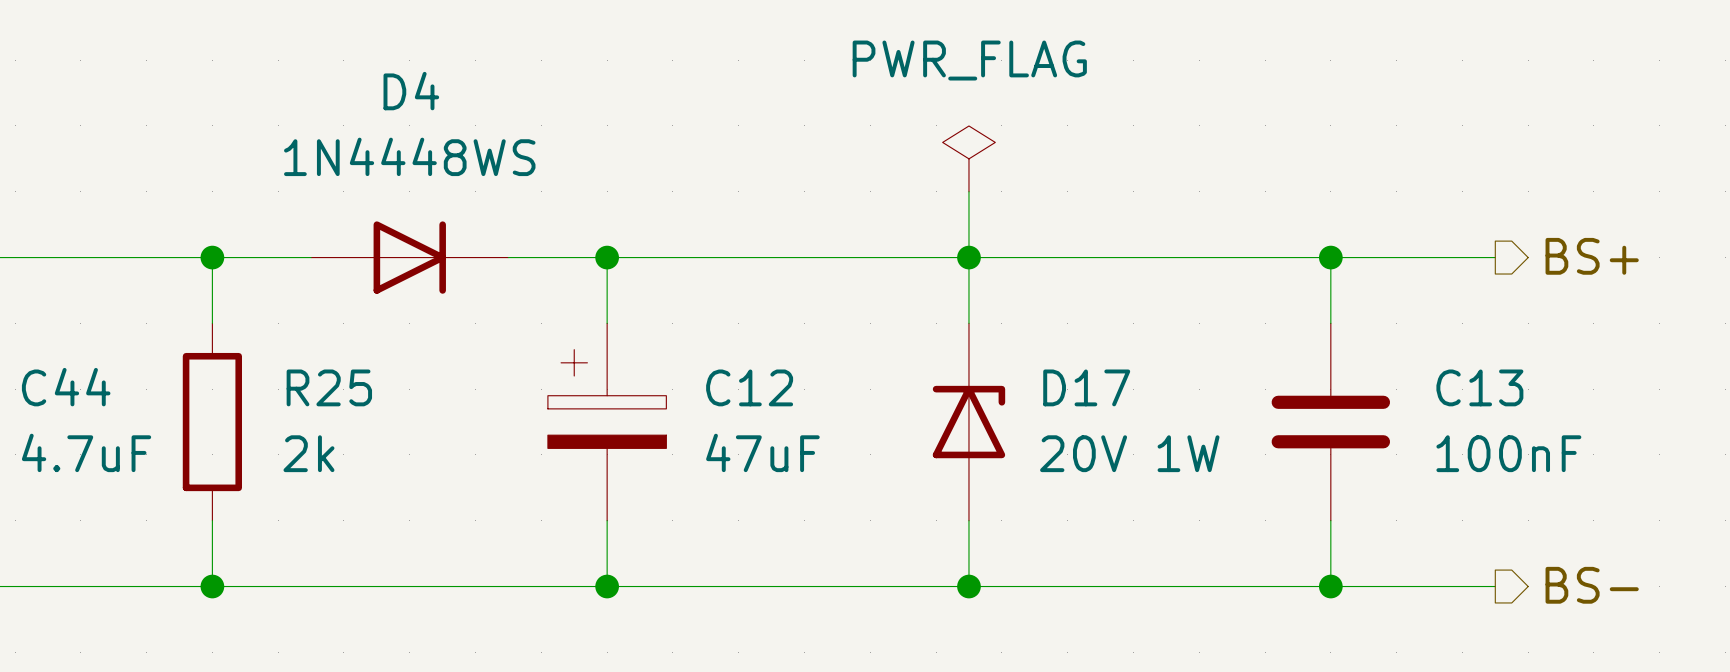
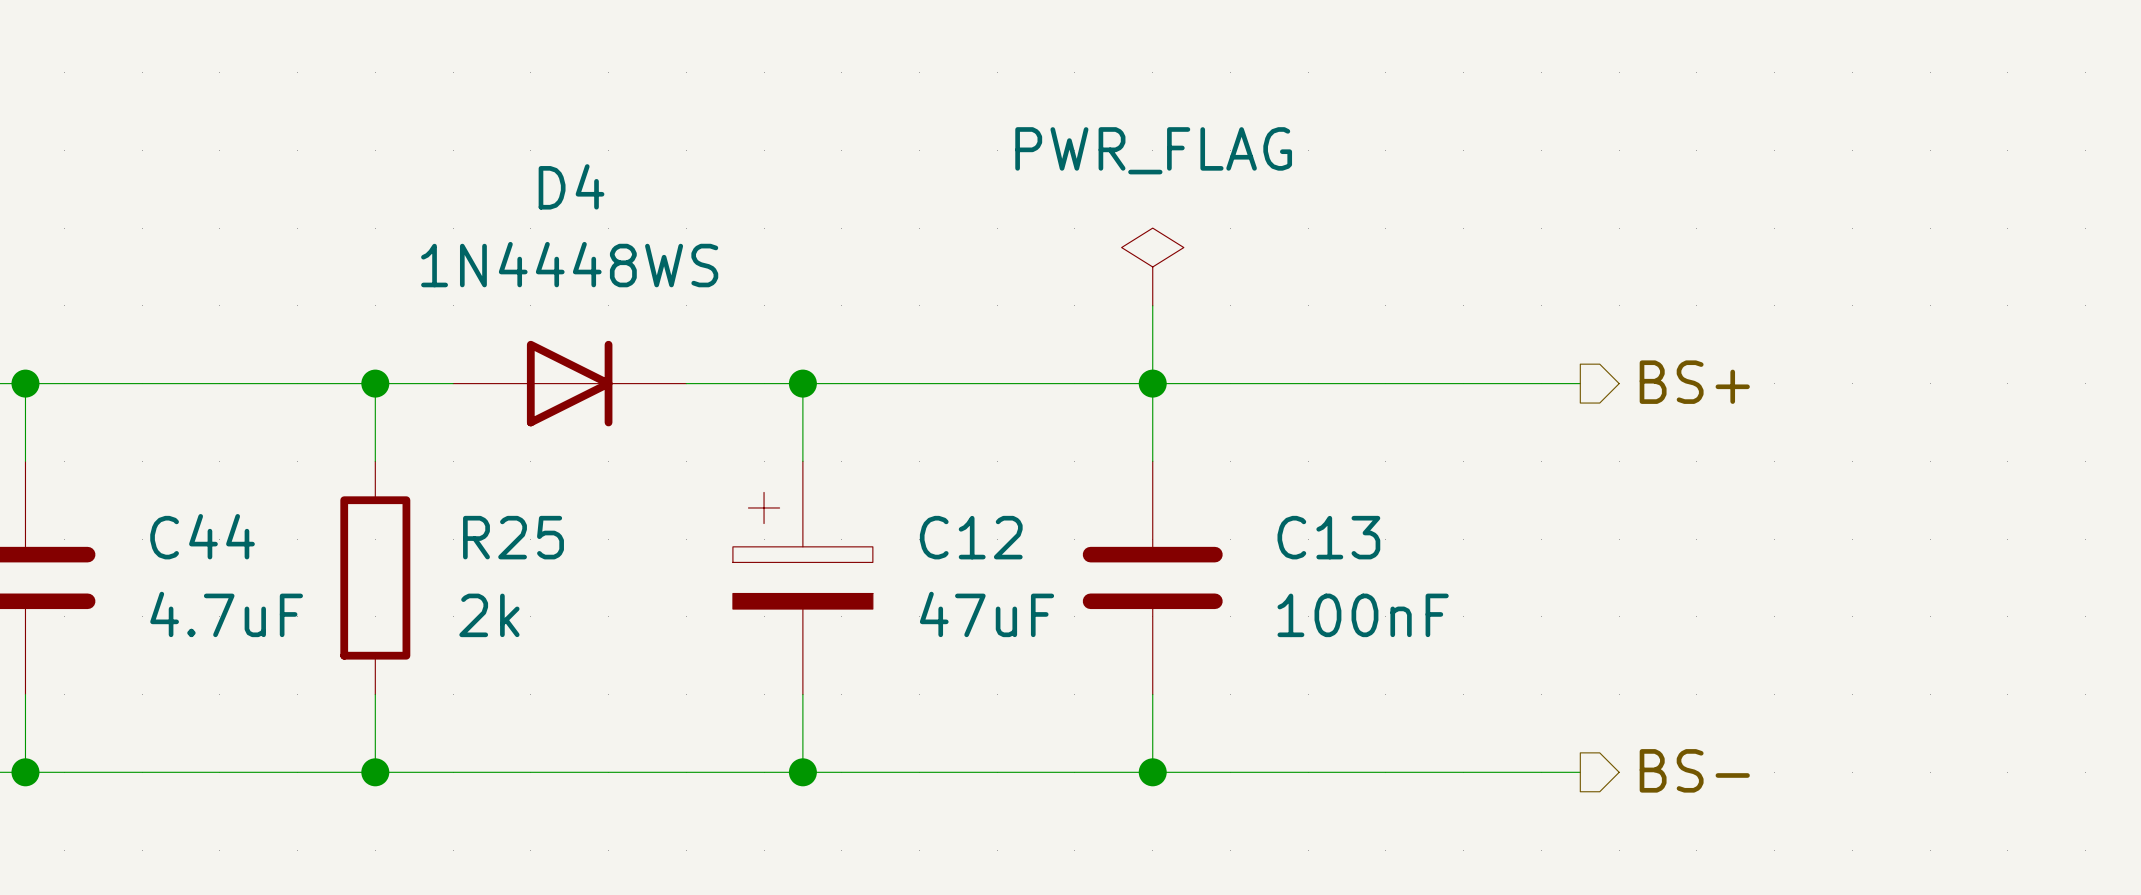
power symbol position: PWR_FLAG (968, 158) -> PWR_FLAG (1152, 266)
wire: (968, 191) (968, 323) -> (1152, 305) (1152, 461)
hierarchical label position: BS+ (1592, 256) -> BS+ (1694, 382)
D4 position: (409, 257) -> (569, 383)
wire: (607, 257) (607, 323) -> (802, 383) (802, 461)
junction position: (607, 257) -> (802, 383)
junction position: (968, 257) -> (1152, 383)
wire: (1232, 257) (1495, 257) -> none
wire: (1330, 257) (1330, 323) -> none
junction: (1330, 257) -> none
C12 position: (607, 422) -> (802, 577)
D17: 20V 1W (968, 422) -> none
C13 position: (1330, 422) -> (1152, 577)
wire: (607, 520) (607, 586) -> (802, 694) (802, 772)
wire: (968, 520) (968, 586) -> (1152, 694) (1152, 772)
wire: (1330, 520) (1330, 586) -> none
hierarchical label position: BS- (1592, 585) -> BS- (1694, 770)
junction position: (607, 586) -> (802, 772)
junction position: (968, 586) -> (1152, 772)
wire: (1232, 586) (1495, 586) -> none
junction: (1330, 586) -> none

